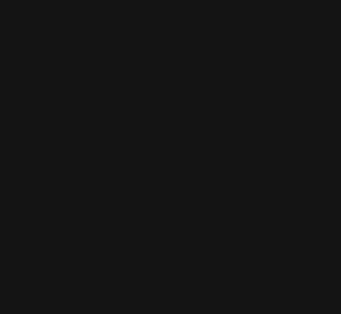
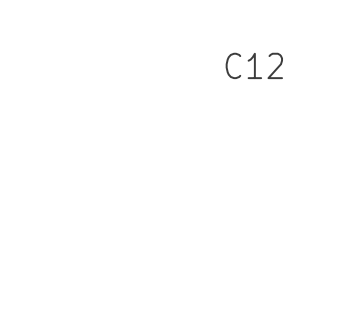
C12: none -> (254, 65)

